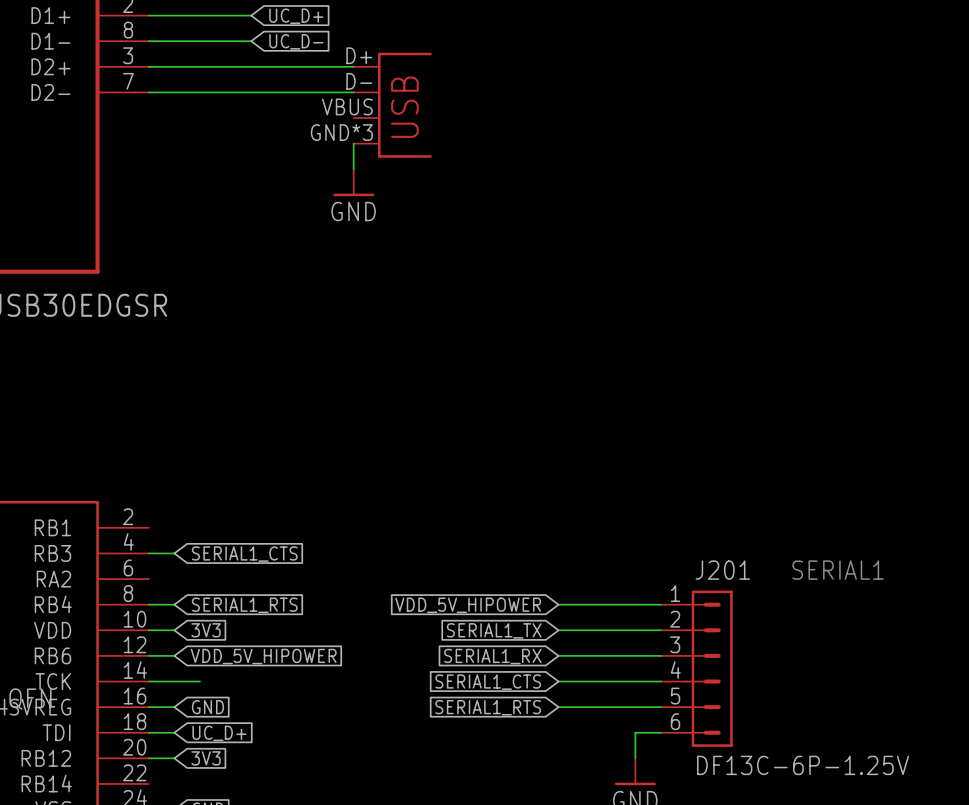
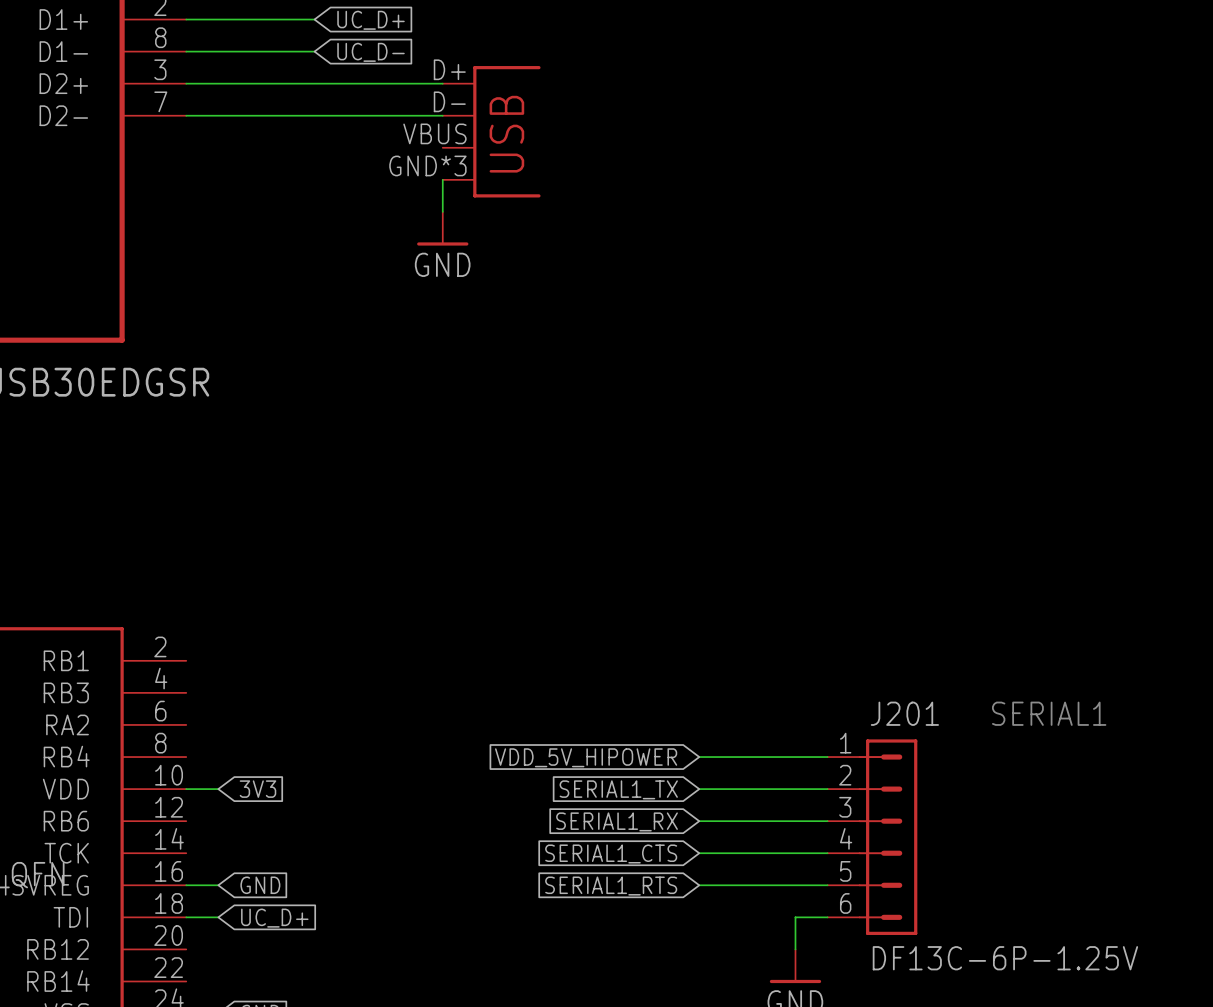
wire: (148, 553) (174, 553) -> none
global label: SERIAL1_CTS (244, 554) -> none
wire: (148, 604) (174, 604) -> none
global label: SERIAL1_RTS (244, 605) -> none
wire: (148, 655) (174, 655) -> none
global label: VDD_5V_HIPOWER (263, 656) -> none
wire: (148, 681) (199, 681) -> none
wire: (148, 758) (174, 758) -> none
global label: 3V3 (206, 758) -> none

